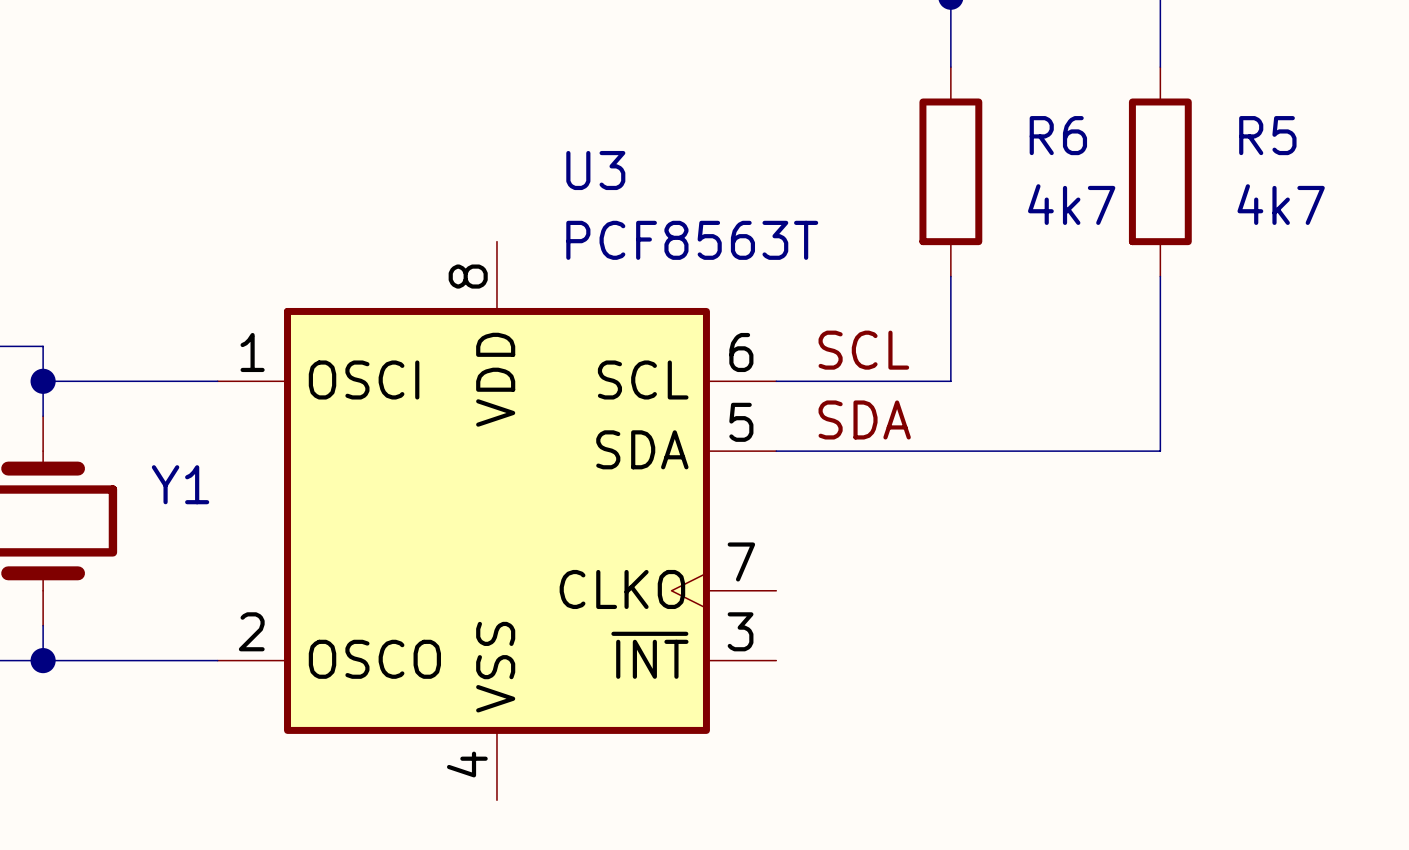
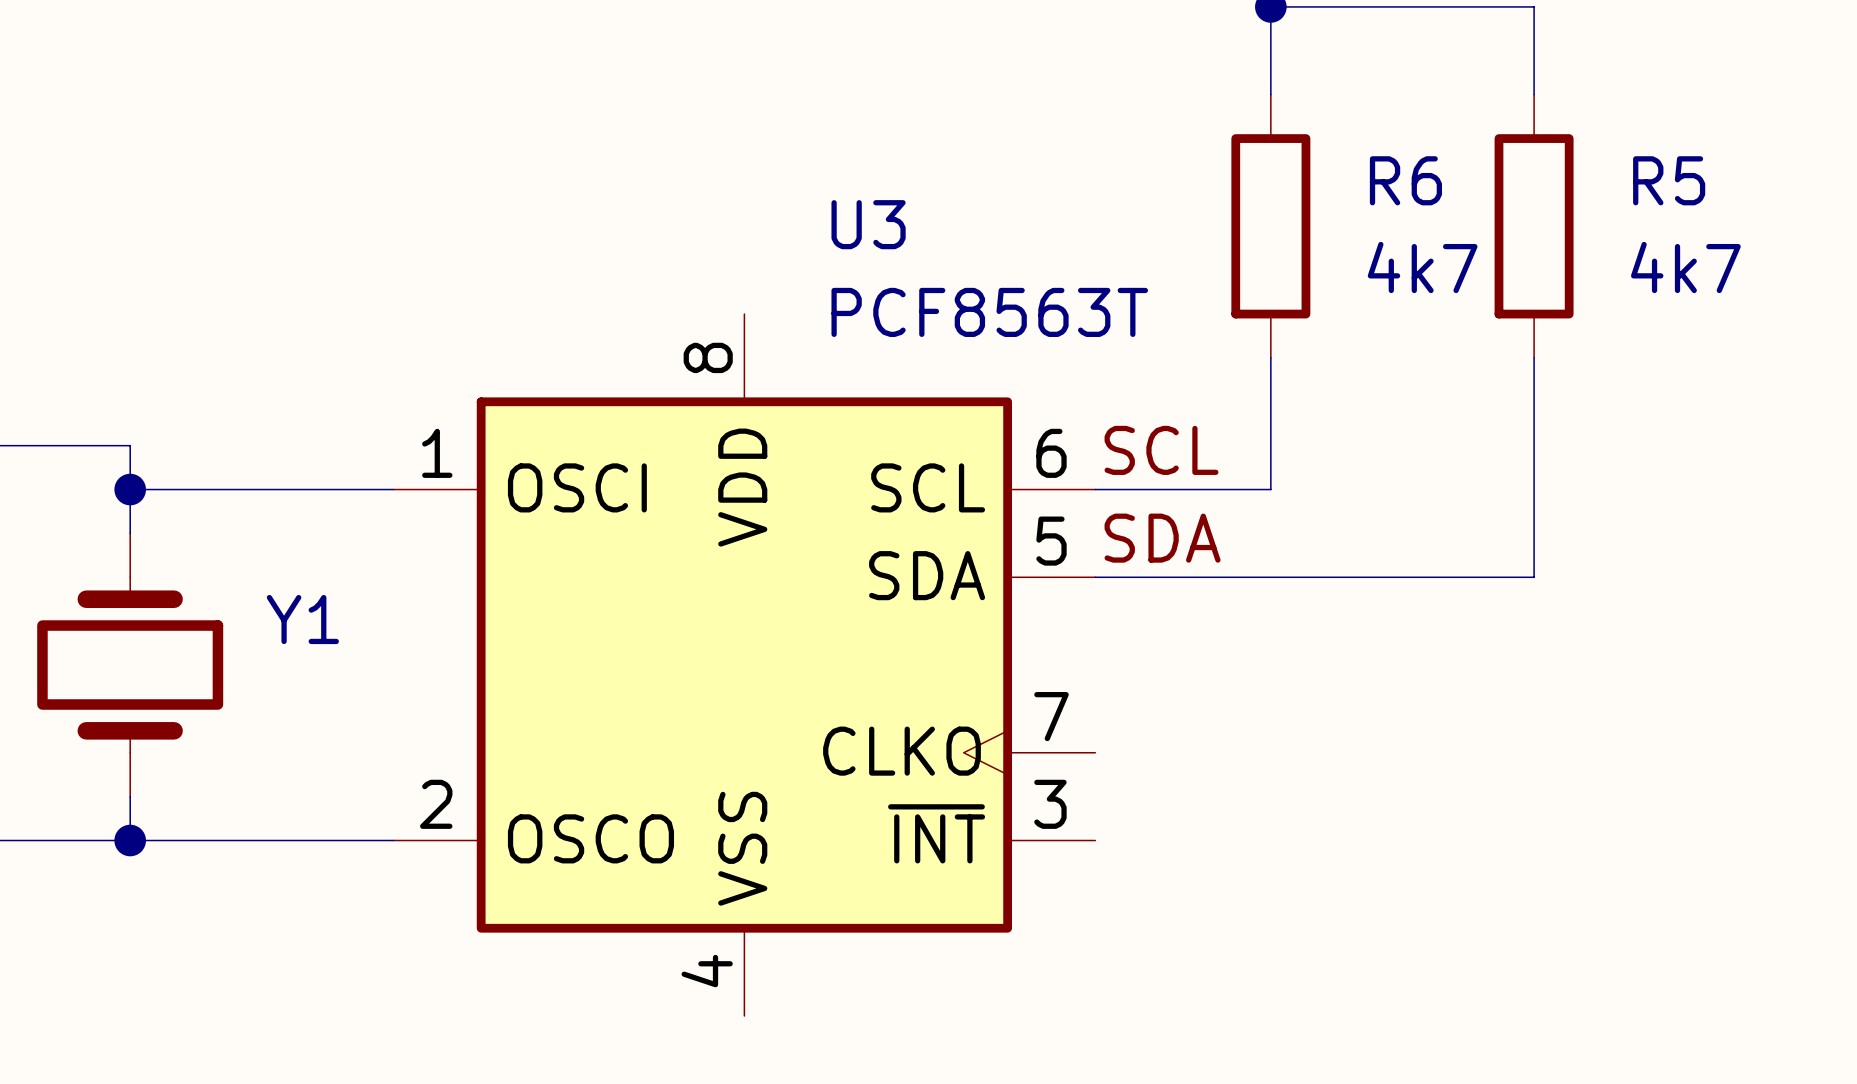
U3 position: (496, 520) -> (744, 665)

